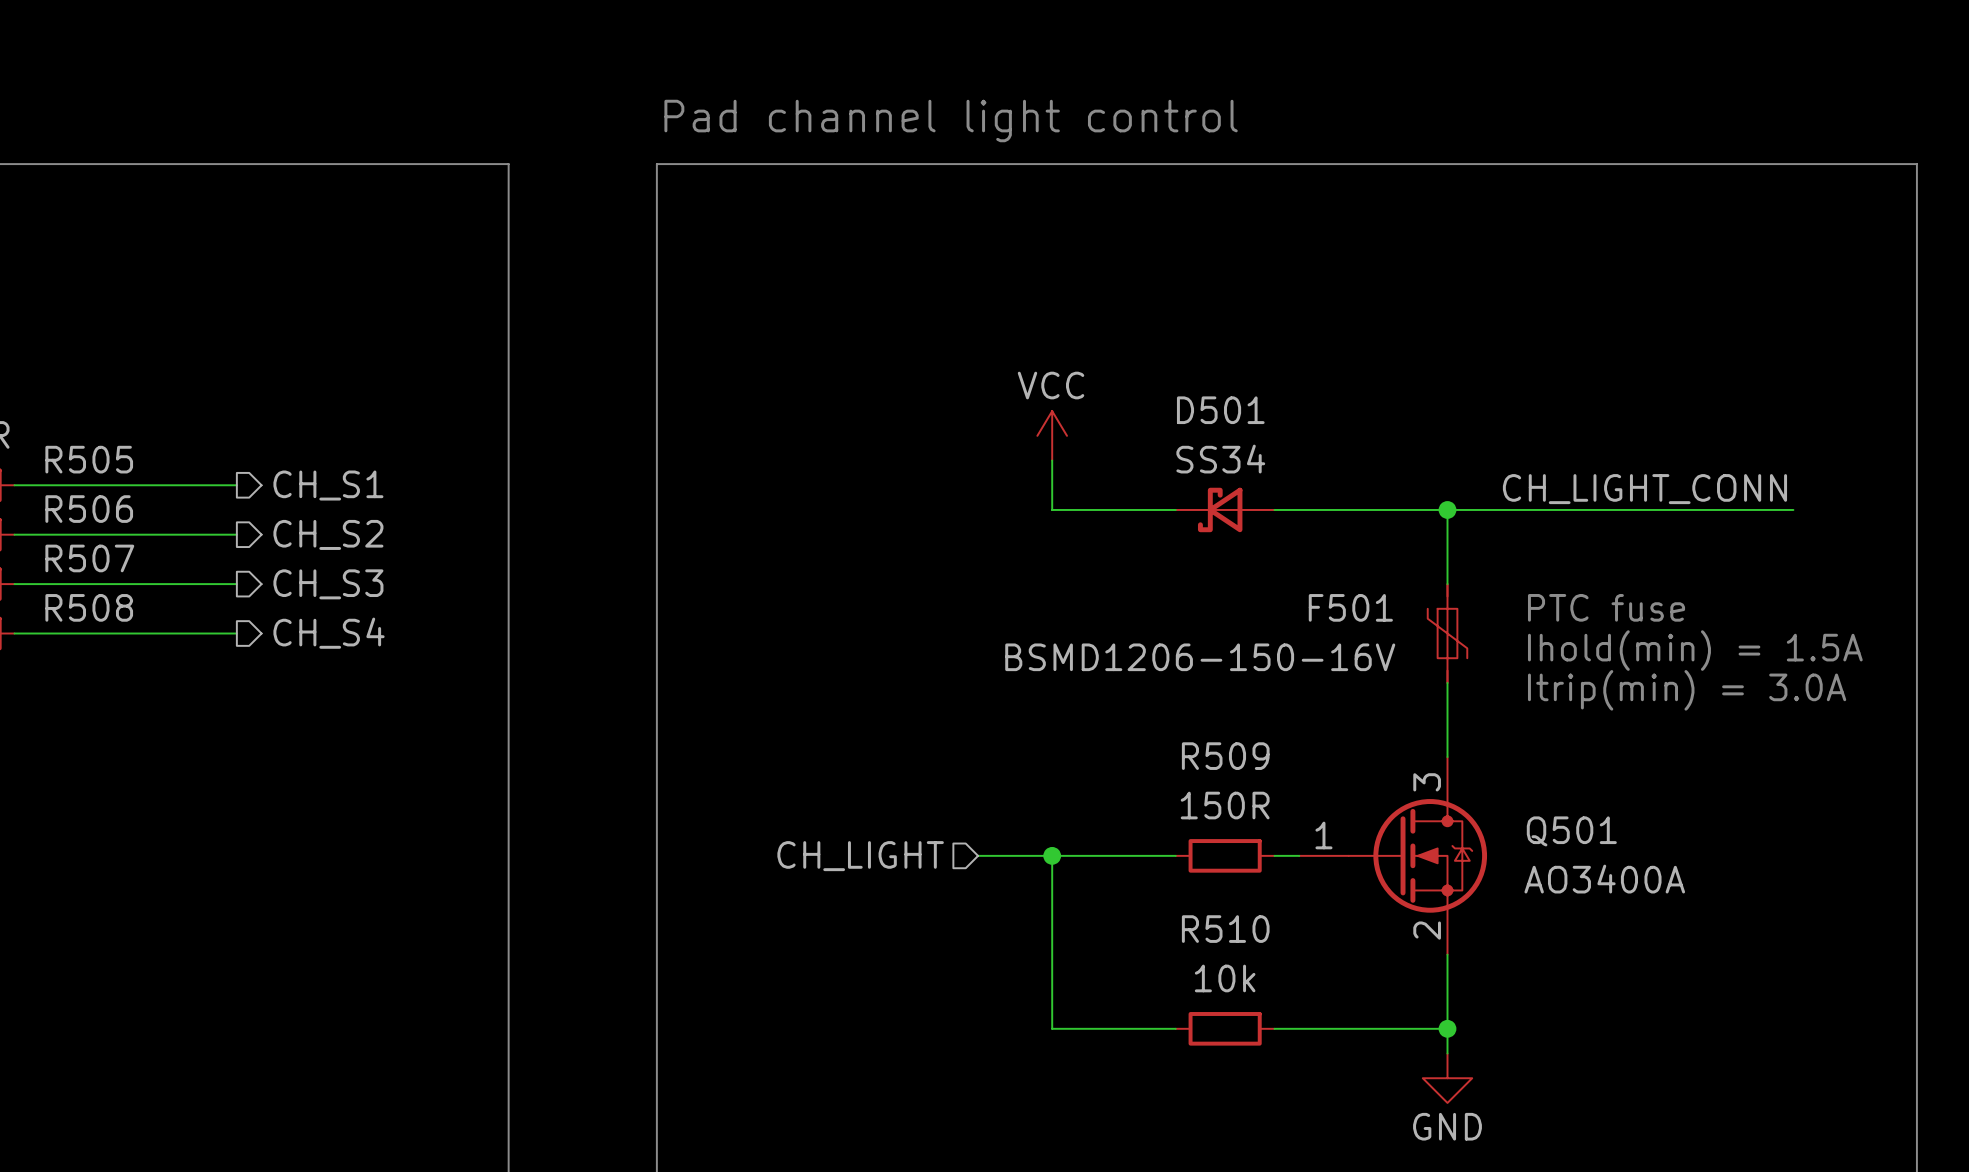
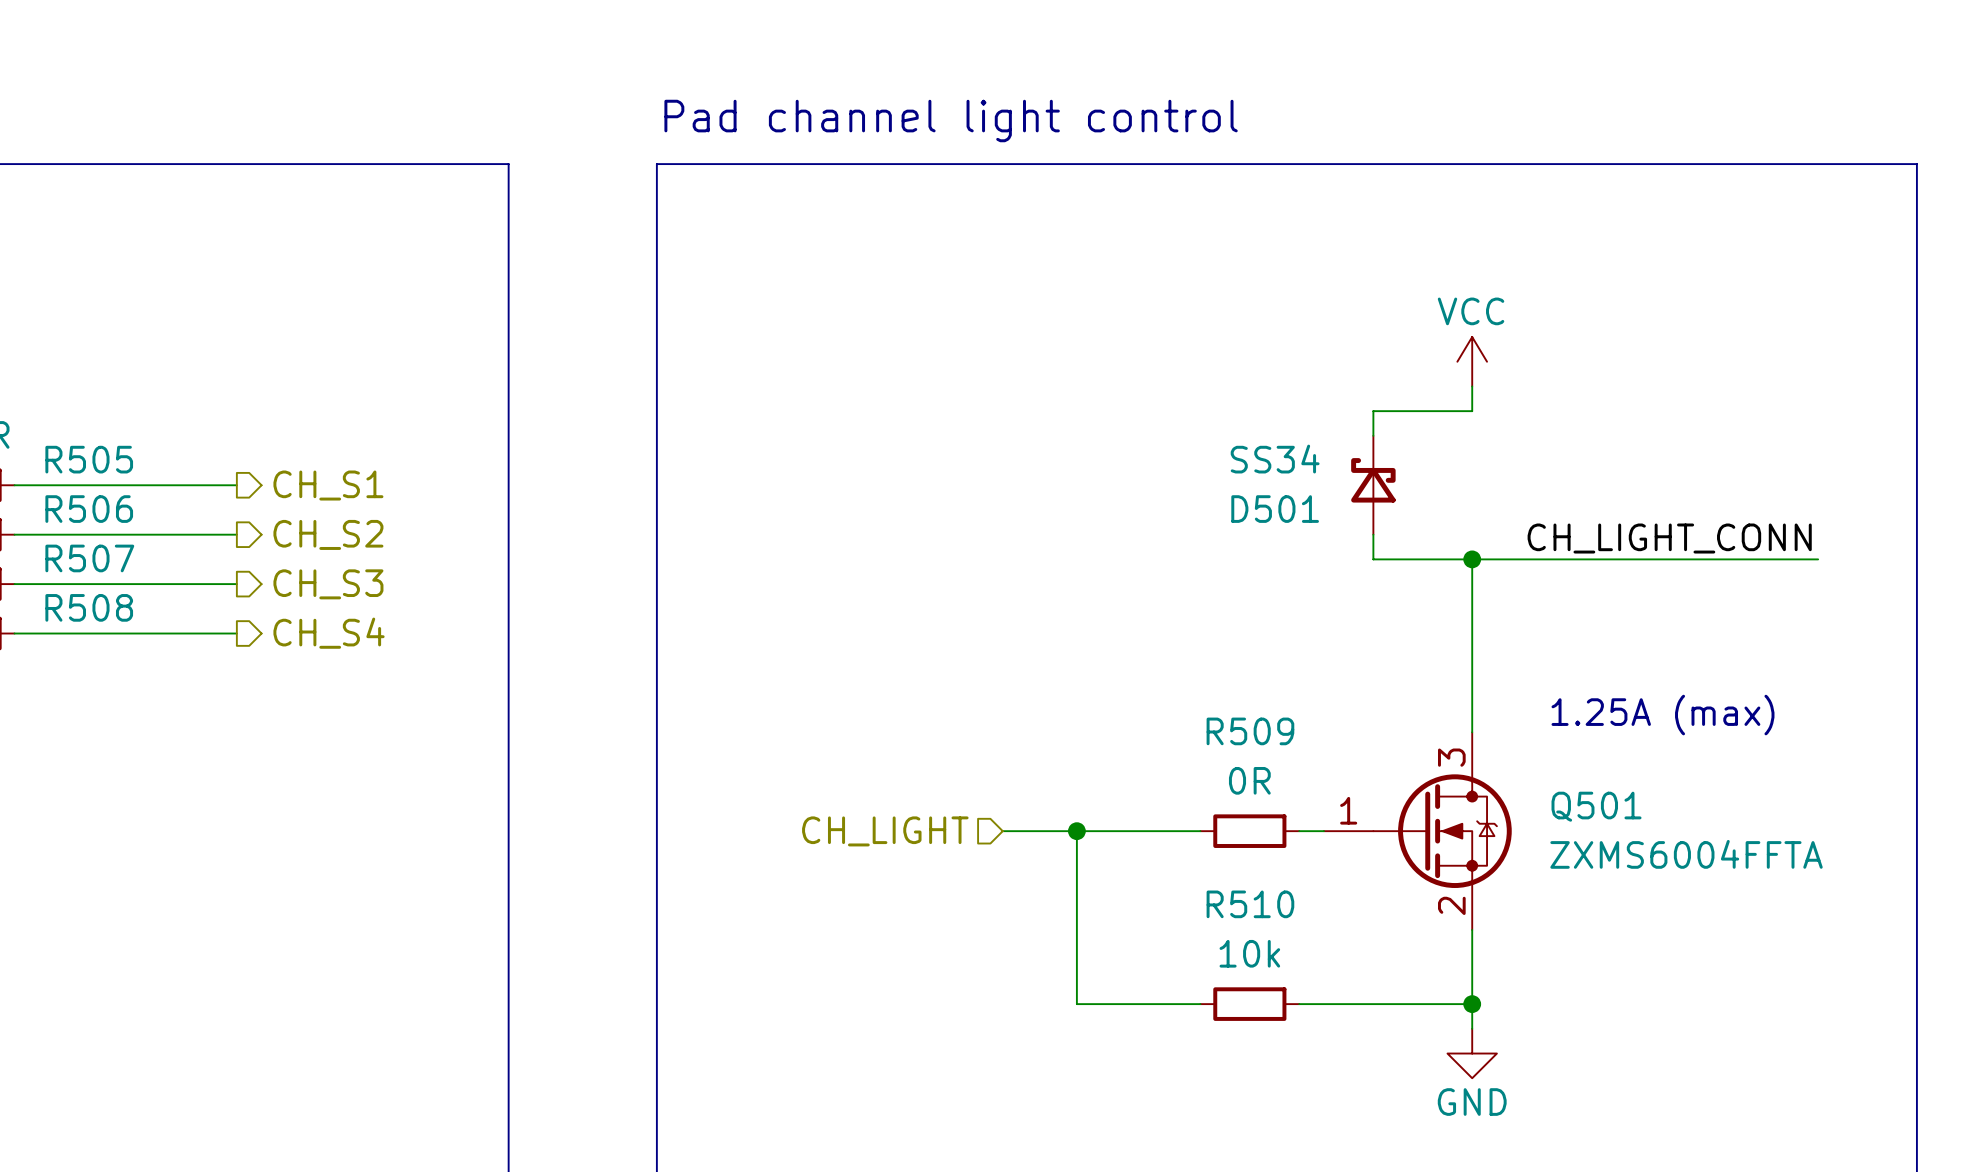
wire: none -> (1472, 386) (1472, 411) (1373, 411) (1373, 435)
D501 name position: D501 (1220, 410) -> D501 (1275, 509)
power symbol position: VCC (1052, 435) -> VCC (1472, 361)
D501 value position: SS34 (1220, 459) -> SS34 (1275, 459)
wire: (1052, 460) (1052, 509) (1175, 509) -> none
label position: CH_LIGHT_CONN (1644, 489) -> CH_LIGHT_CONN (1669, 538)
D501 rotation: 0° (1220, 509) -> 90° clockwise (1373, 480)
D501 position: (1225, 509) -> (1373, 485)
wire: (1274, 509) (1793, 509) -> none
wire: (1447, 509) (1447, 584) -> none
junction position: (1447, 509) -> (1472, 559)
wire: none -> (1373, 534) (1373, 559) (1818, 559)
wire: none -> (1472, 559) (1472, 732)
text: PTC fuse (1606, 607) -> none
F501: BSMD1206-150-16V (1447, 633) -> none
text: Ihold(min) = 1.5A (1695, 650) -> none
wire: (1447, 682) (1447, 757) -> none
text: Itrip(min) = 3.0A (1687, 690) -> none
text: none -> 1.25A (max) (1662, 715)
R509 value: 150R (1225, 805) -> 0R (1249, 780)
wire: (978, 855) (1175, 855) -> (1002, 831) (1200, 831)
wire: (1052, 855) (1052, 1028) (1175, 1028) -> (1076, 831) (1076, 1004) (1200, 1004)
junction position: (1052, 855) -> (1076, 831)
R509 position: (1225, 855) -> (1249, 831)
wire: (1274, 855) (1299, 855) -> (1299, 831) (1323, 831)
Q501 position: (1393, 855) -> (1417, 831)
hierarchical label position: CH_LIGHT (860, 856) -> CH_LIGHT (885, 831)
Q501 value: AO3400A (1604, 879) -> ZXMS6004FFTA (1686, 854)
wire: (1447, 954) (1447, 1053) -> (1472, 929) (1472, 1028)
R510 position: (1225, 1028) -> (1249, 1004)
wire: (1274, 1028) (1447, 1028) -> (1299, 1004) (1472, 1004)
junction position: (1447, 1028) -> (1472, 1004)
power symbol position: GND (1447, 1078) -> GND (1472, 1053)

